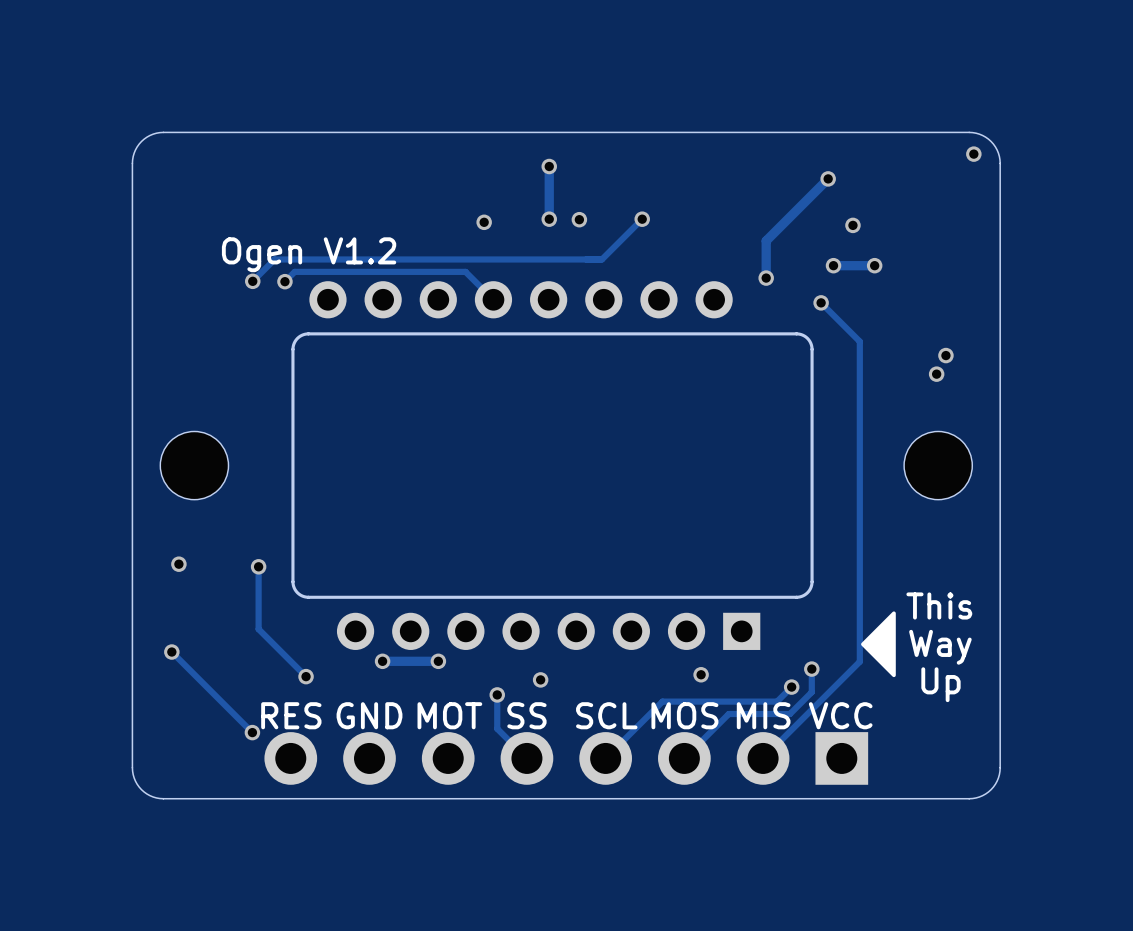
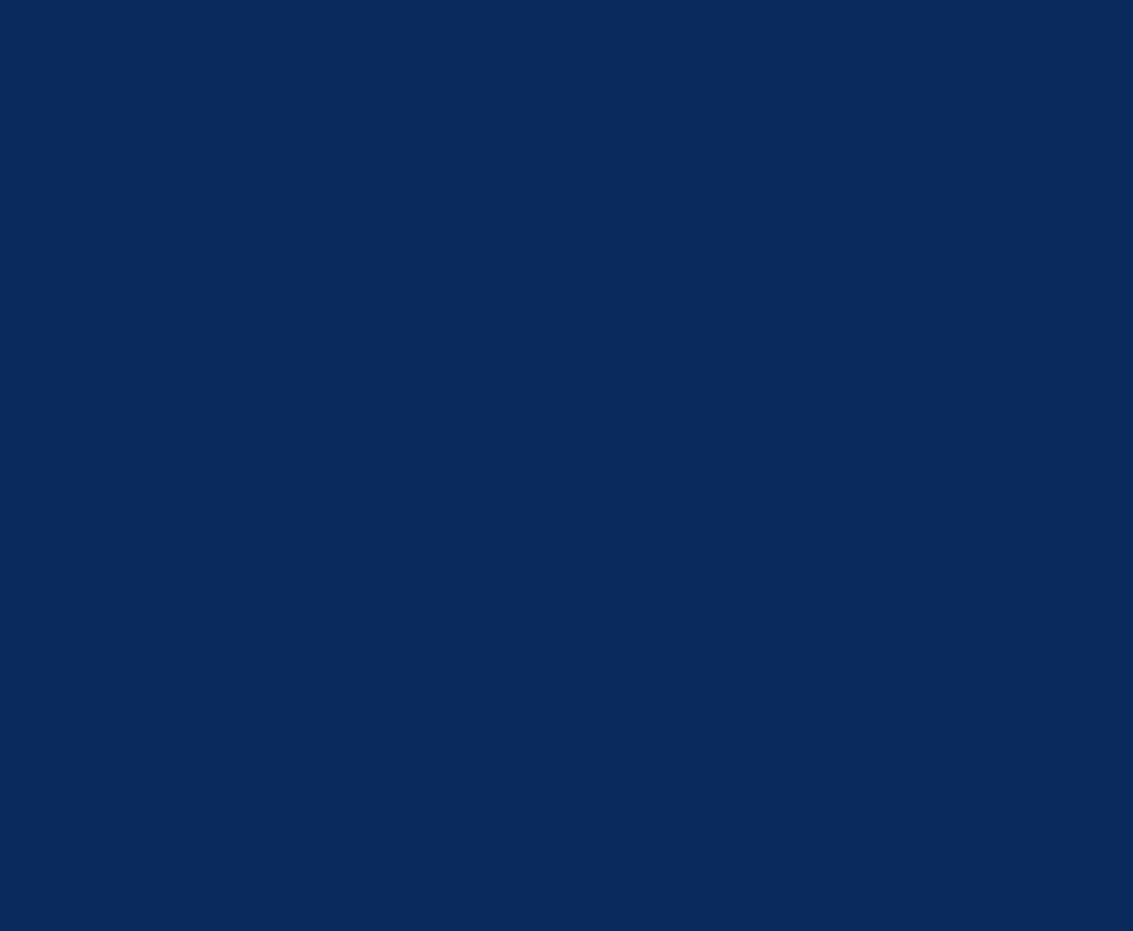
board edge: (163, 132) (969, 132) (979, 134) (988, 139) (997, 149) (1000, 163) (1000, 767) (998, 777) (993, 787) (982, 795) (969, 798) (163, 798) (153, 796) (144, 791) (135, 781) (132, 767) (132, 163) (134, 153) (141, 141) (149, 135) (163, 132) -> none
via: (973, 154) -> none
track: (549, 166) (549, 219) -> none
via: (549, 166) -> none
track: (828, 178) (766, 240) (766, 278) -> none
via: (828, 178) -> none
via: (549, 219) -> none
via: (579, 219) -> none
track: (642, 219) (601, 259) (274, 259) (252, 281) -> none
via: (642, 219) -> none
via: (484, 222) -> none
via: (852, 225) -> none
text: Ogen V1.2 (309, 254) -> none
track: (833, 265) (874, 265) -> none
via: (833, 265) -> none
via: (874, 265) -> none
via: (766, 278) -> none
via: (252, 281) -> none
track: (284, 281) (294, 271) (465, 271) (493, 299) -> none
via: (284, 281) -> none
track: (821, 302) (859, 341) (859, 661) (763, 758) -> none
via: (821, 302) -> none
via: (945, 355) -> none
via: (936, 374) -> none
part: (194, 465) -> none
part: (552, 465) -> none
part: (938, 465) -> none
via: (178, 564) -> none
track: (258, 566) (258, 629) (306, 676) -> none
via: (258, 566) -> none
text: This (939, 605) -> none
drawing: [861, 611, 896, 678] -> none
text: Way (940, 647) -> none
track: (171, 652) (252, 732) -> none
via: (171, 652) -> none
track: (382, 661) (438, 661) -> none
via: (382, 661) -> none
via: (438, 661) -> none
track: (811, 669) (811, 692) (790, 714) (728, 714) (684, 758) -> none
via: (811, 669) -> none
via: (701, 674) -> none
via: (306, 676) -> none
via: (540, 679) -> none
text: Up (940, 684) -> none
track: (791, 687) (777, 701) (662, 701) (605, 758) -> none
via: (791, 687) -> none
track: (497, 694) (497, 728) (526, 758) -> none
via: (497, 694) -> none
text: RES (291, 715) -> none
text: GND (369, 715) -> none
text: MOT (449, 715) -> none
text: SS (526, 715) -> none
text: SCL (606, 715) -> none
text: MOS (684, 715) -> none
text: MIS (763, 715) -> none
text: VCC (840, 715) -> none
via: (252, 732) -> none
part: (566, 758) -> none

